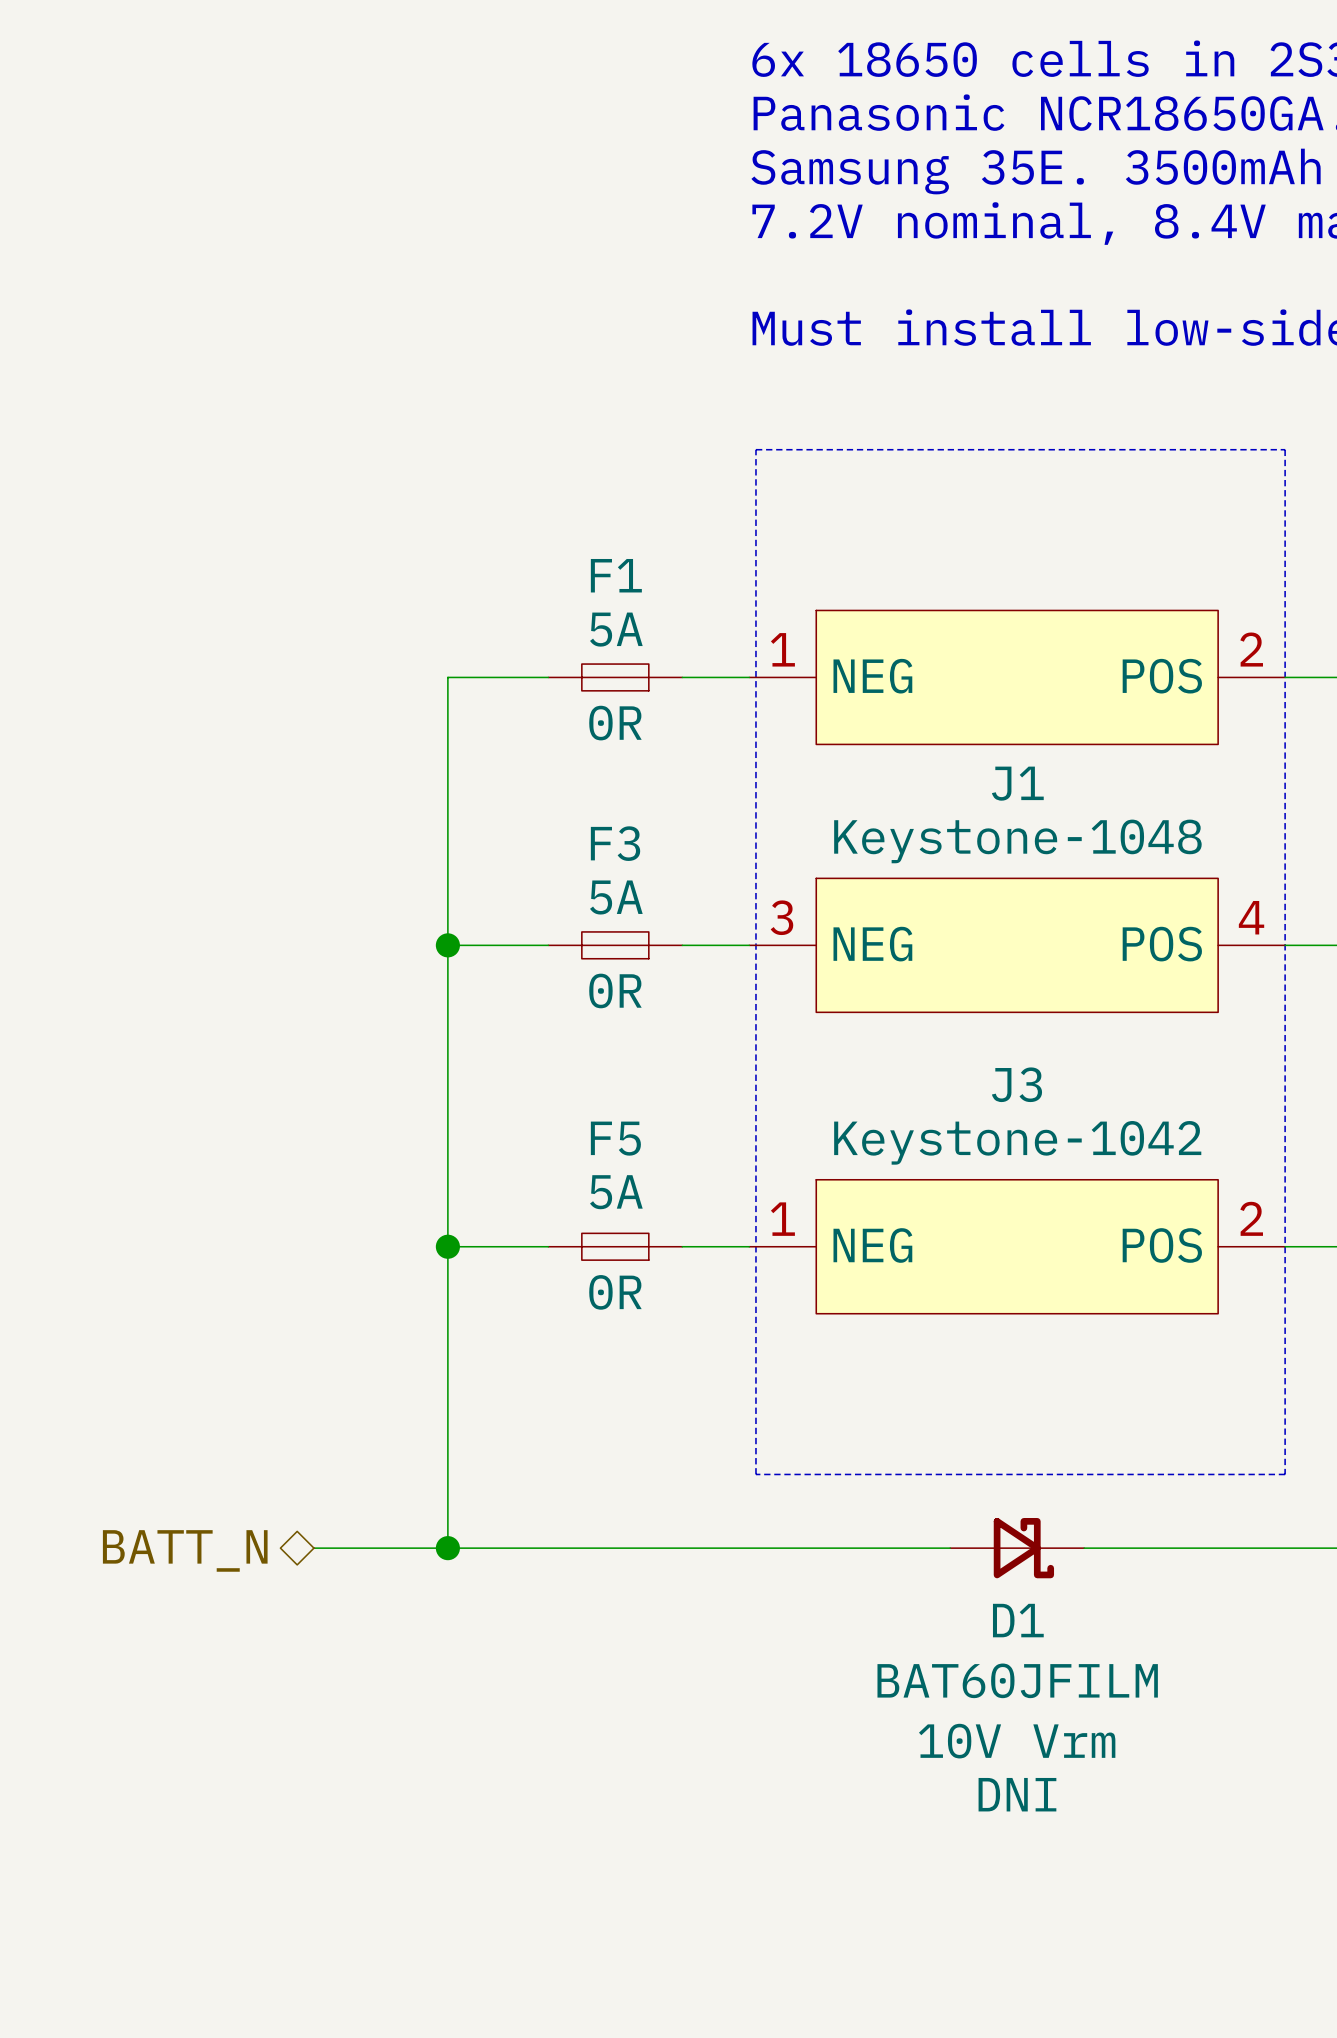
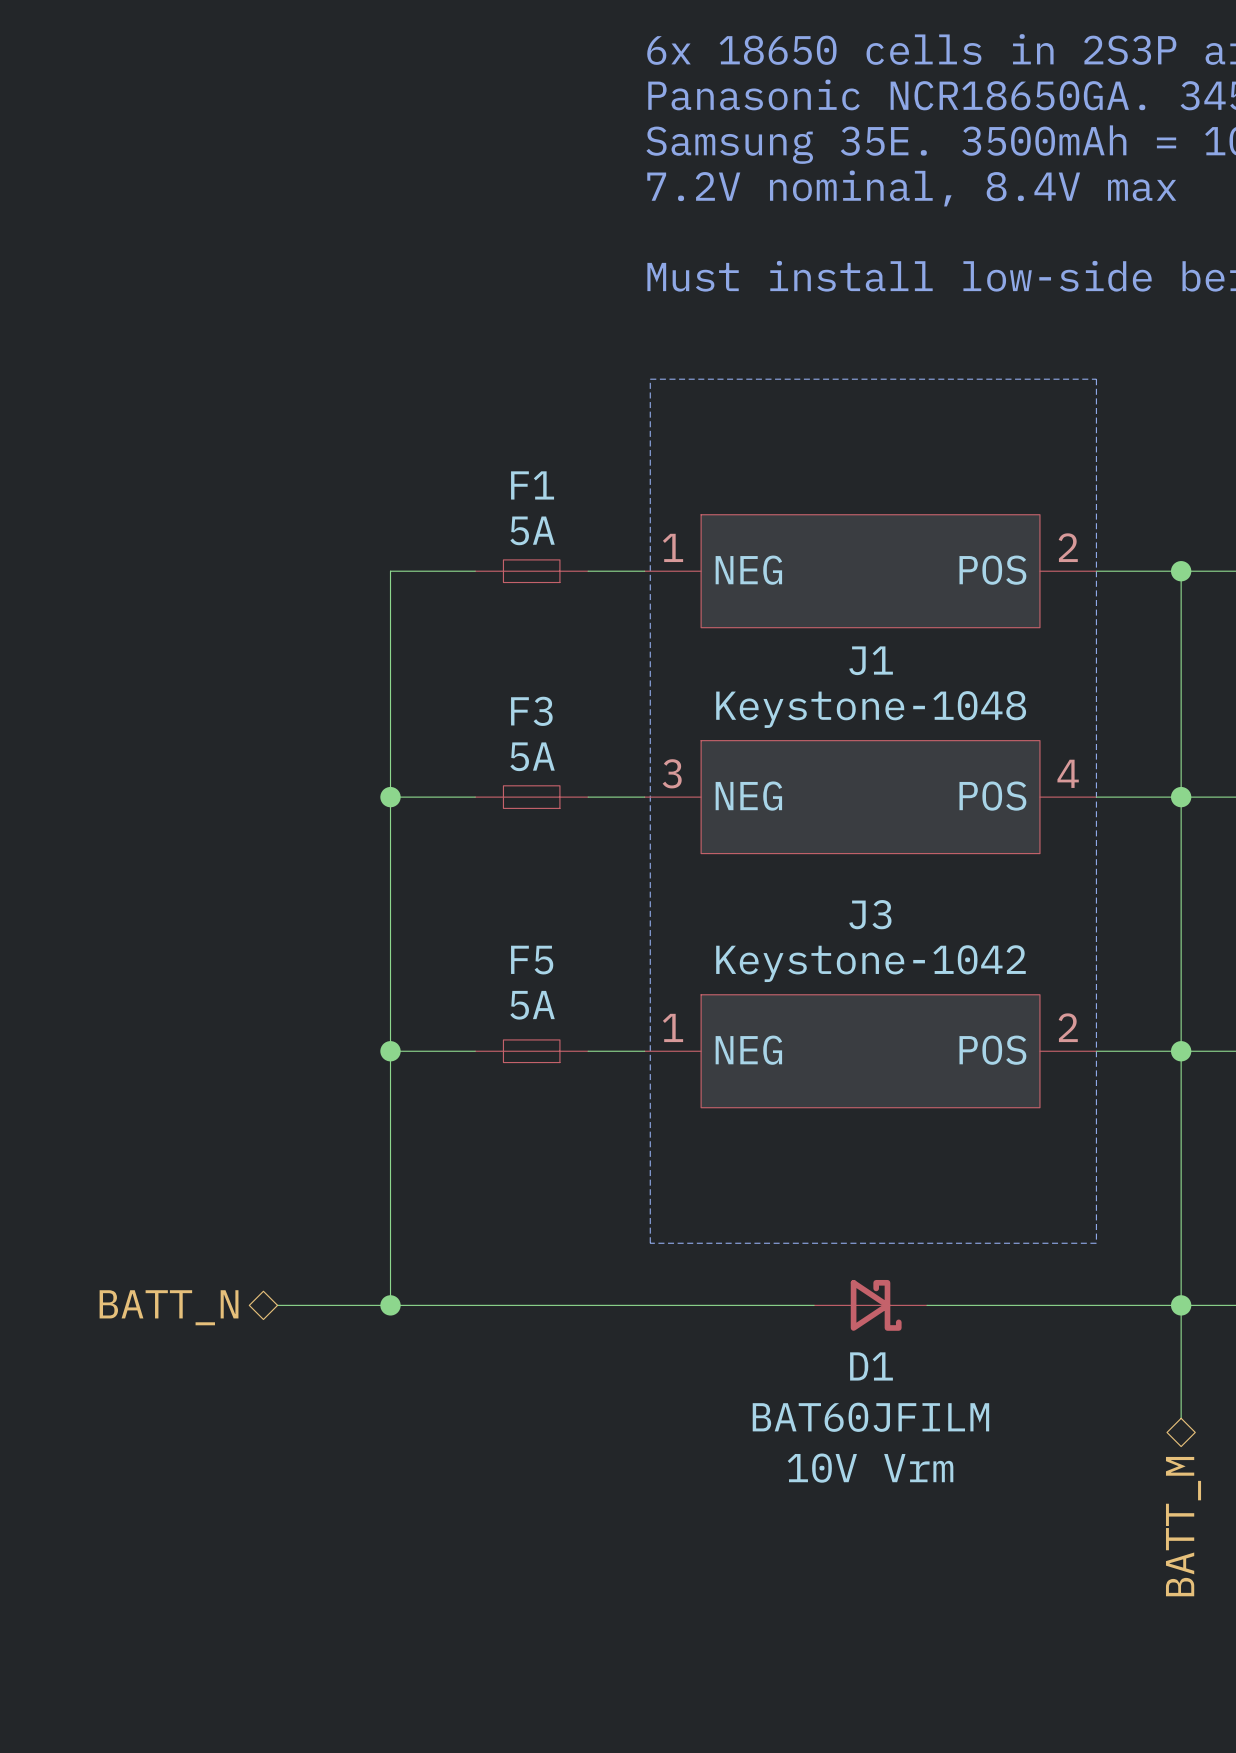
F1 text: 0R (615, 723) -> none
F3 text: 0R (615, 990) -> none
F5 text: 0R (615, 1292) -> none
D1 text: DNI (1017, 1794) -> none

